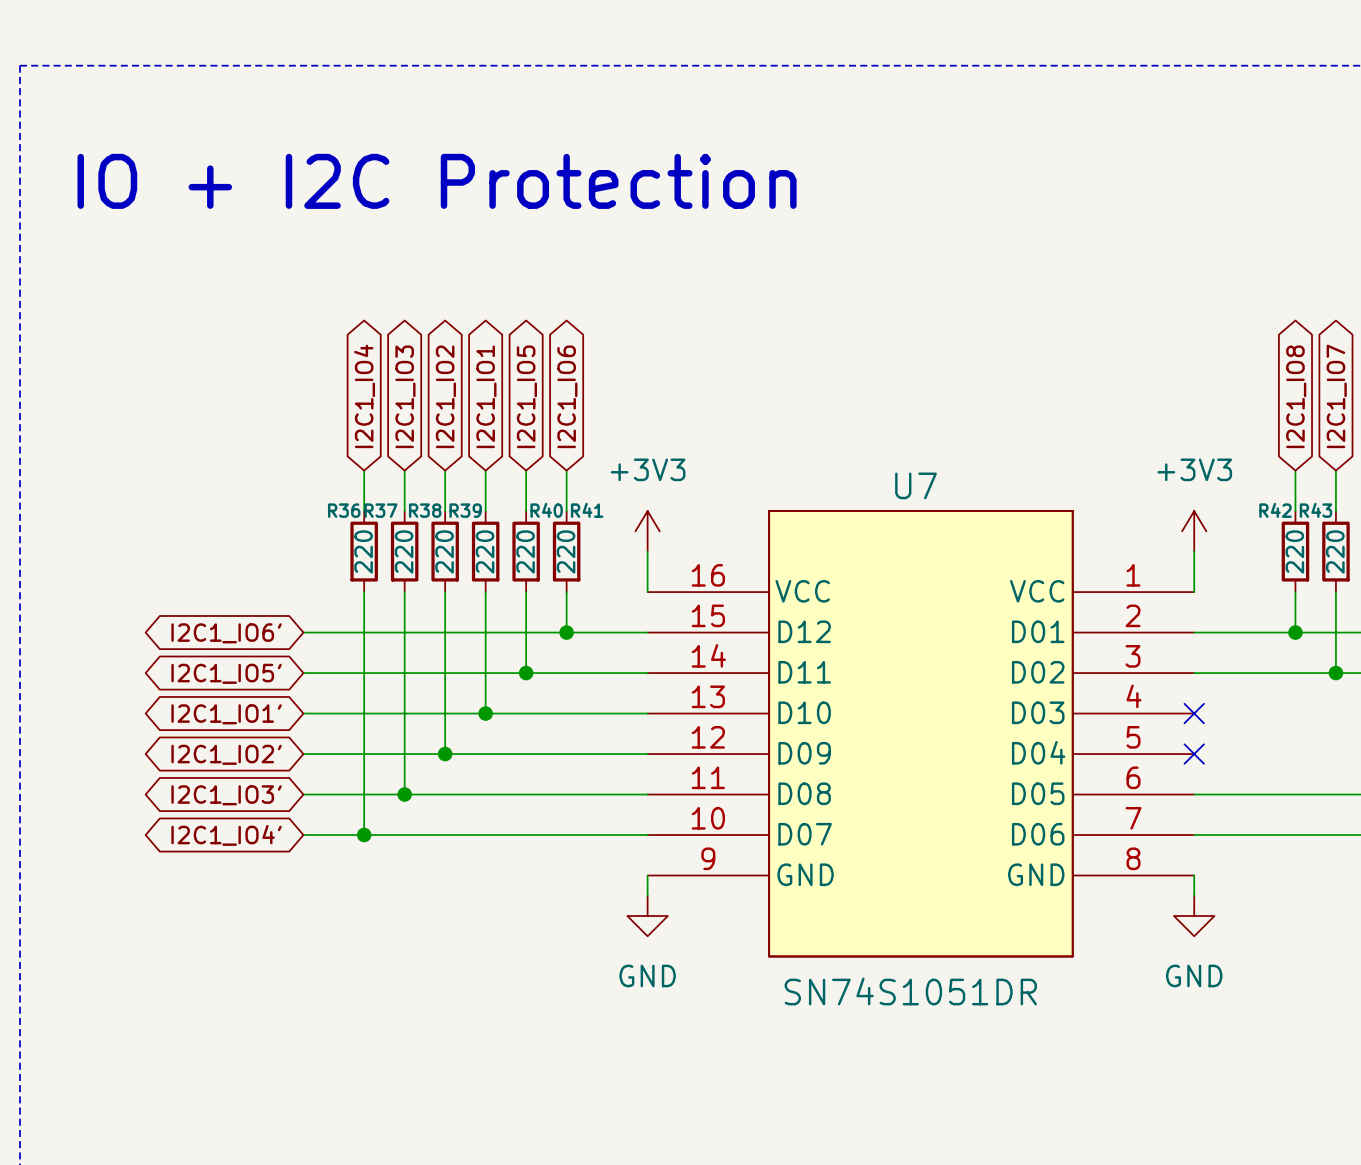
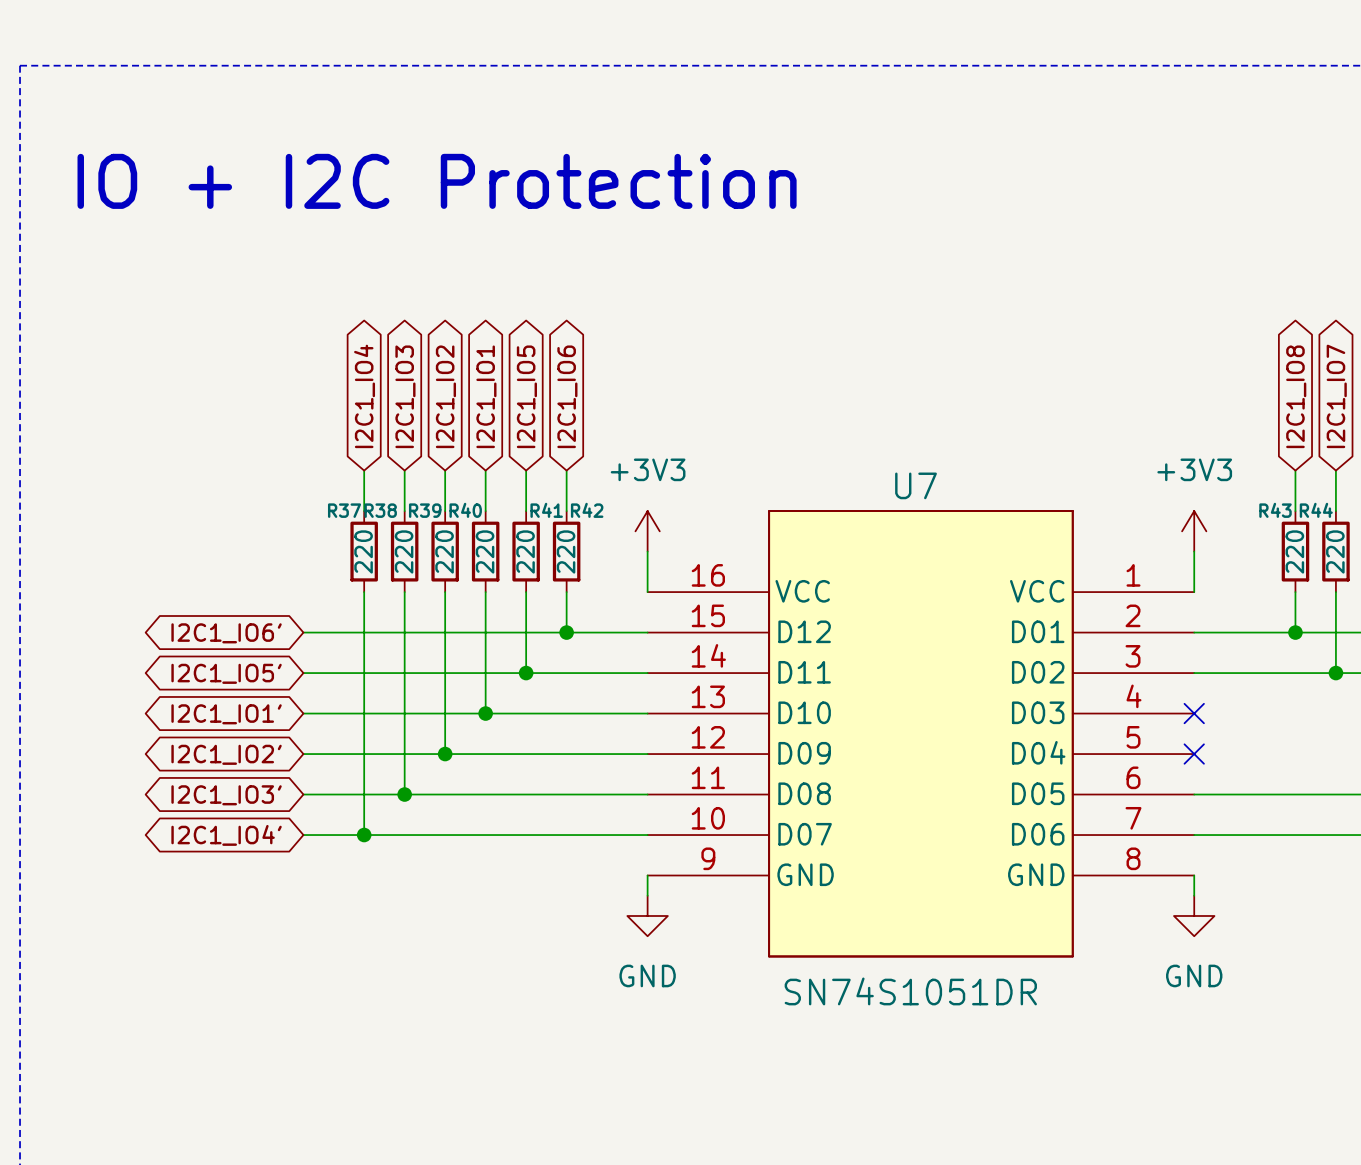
R36 name: R36 (344, 510) -> R37 (344, 510)
R37 name: R37 (380, 510) -> R38 (380, 510)
R38 name: R38 (425, 510) -> R39 (425, 510)
R39 name: R39 (465, 510) -> R40 (465, 510)
R40 name: R40 (546, 510) -> R41 (546, 510)
R41 name: R41 (587, 510) -> R42 (587, 510)
R42 name: R42 (1275, 510) -> R43 (1275, 510)
R43 name: R43 (1315, 510) -> R44 (1316, 510)

